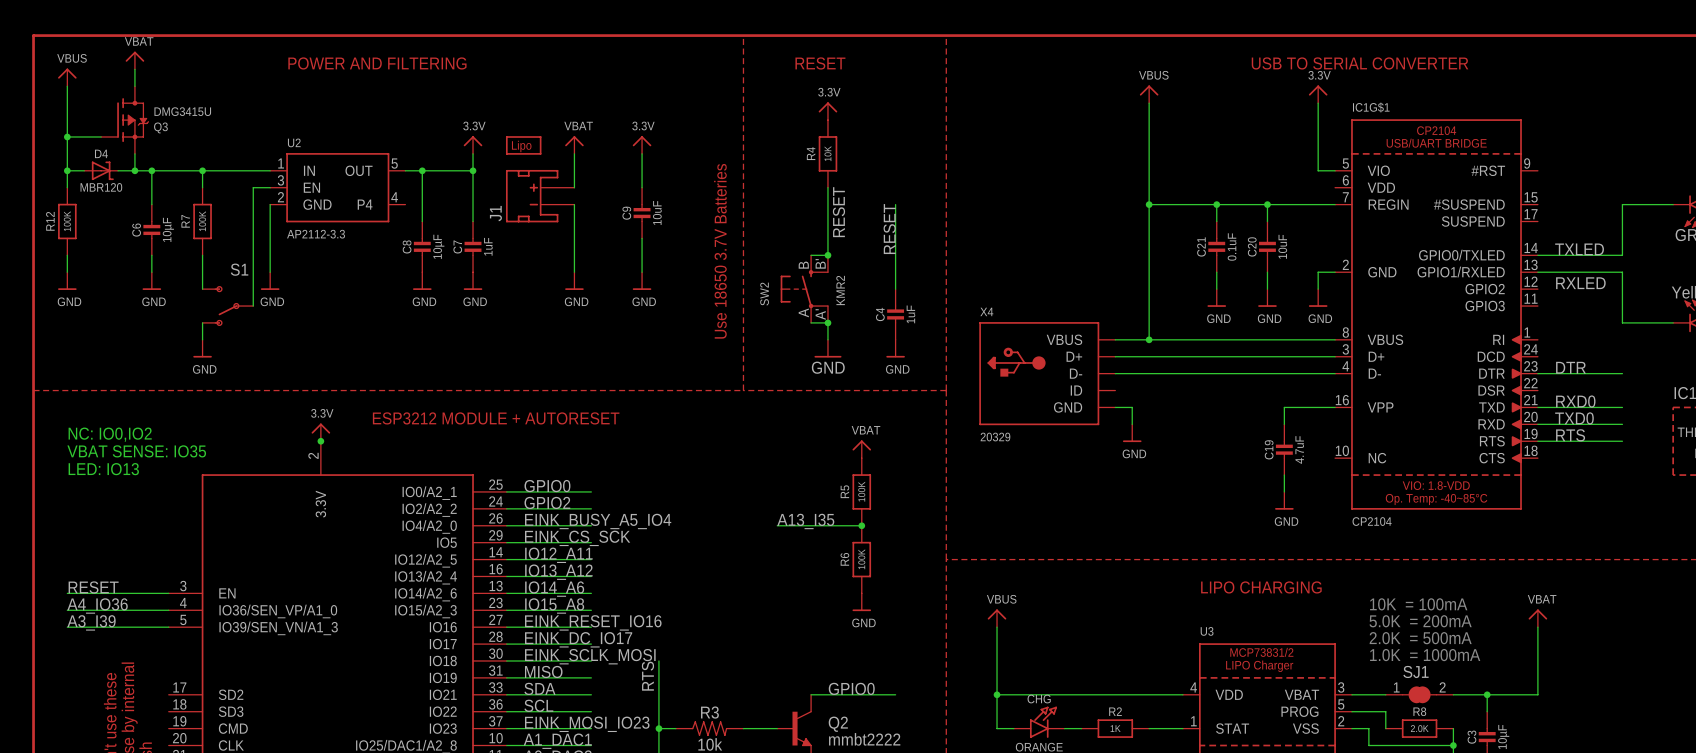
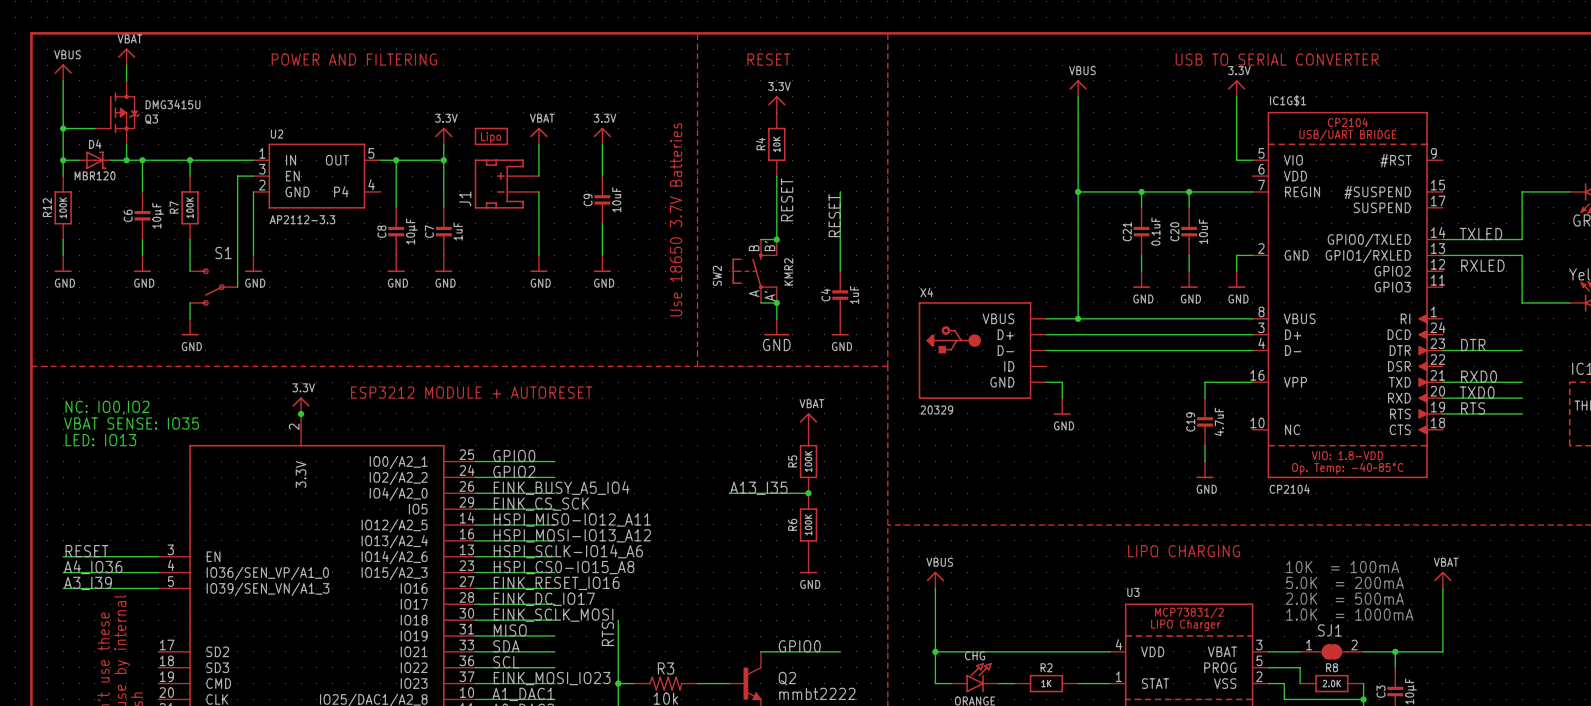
label: IO12_A11 (558, 555) -> HSPI_MISO-IO12_A11 (572, 519)
label: IO13_A12 (558, 572) -> HSPI_MOSI-IO13_A12 (572, 535)
label: IO14_A6 (554, 589) -> HSPI_SCLK-IO14_A6 (568, 551)
label: IO15_A8 (554, 605) -> HSPI_CS0-IO15_A8 (564, 567)

